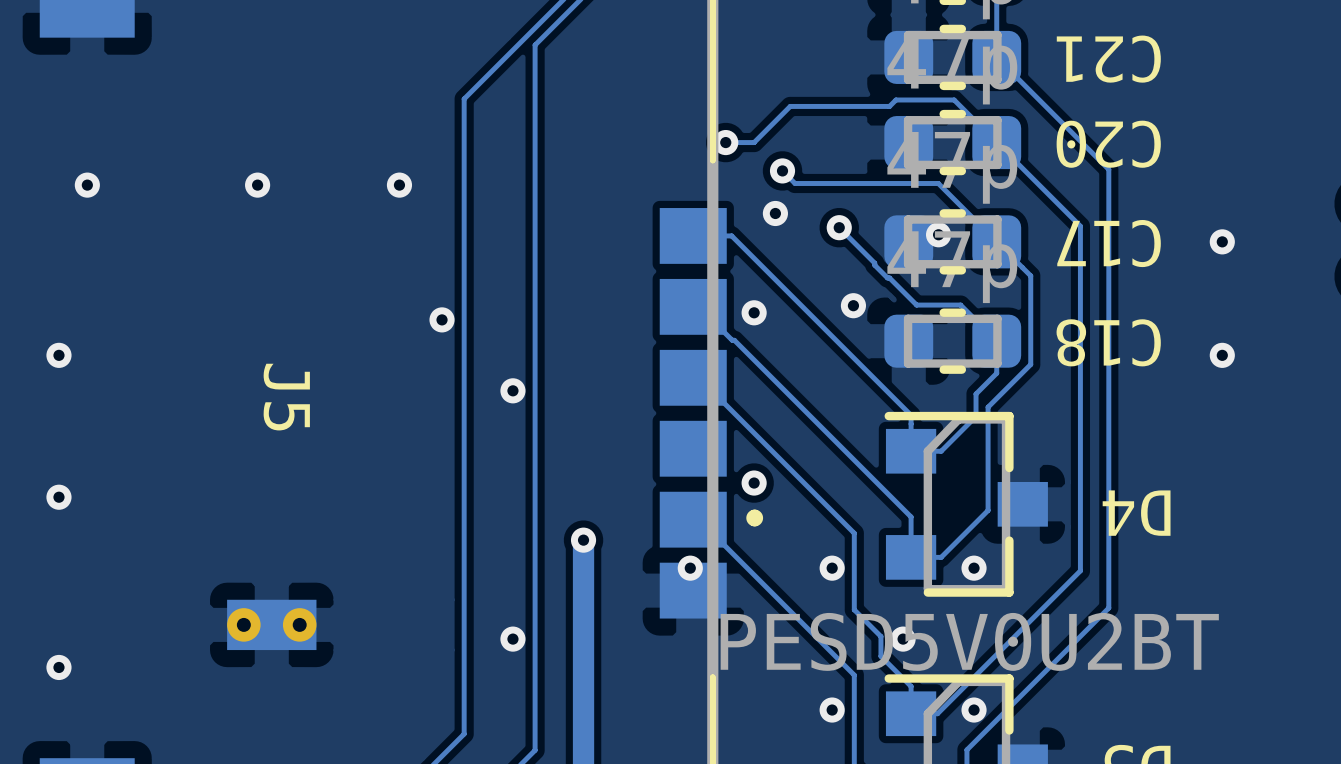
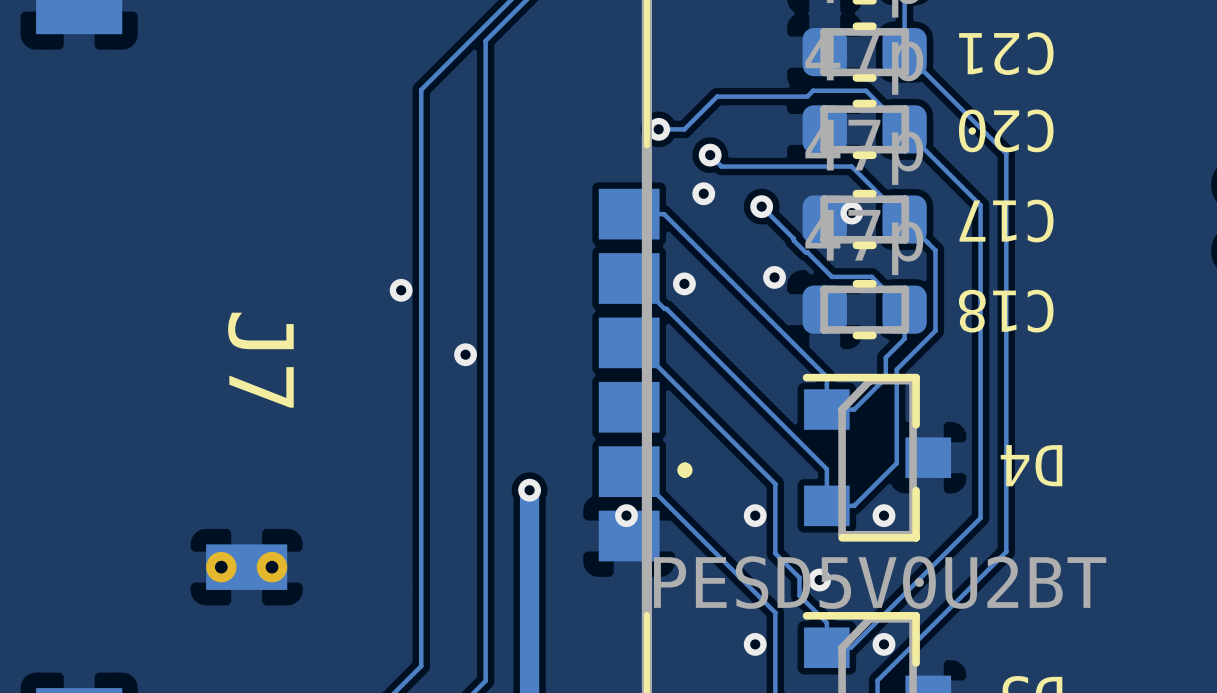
via: (87, 185) -> none
via: (257, 185) -> none
via: (399, 185) -> none
via: (1222, 241) -> none
via: (58, 355) -> none
via: (1222, 355) -> none
J5 name: J5 (286, 397) -> J7 (260, 360)
via: (754, 483) -> none
via: (58, 497) -> none
via: (512, 639) -> none
via: (58, 667) -> none

